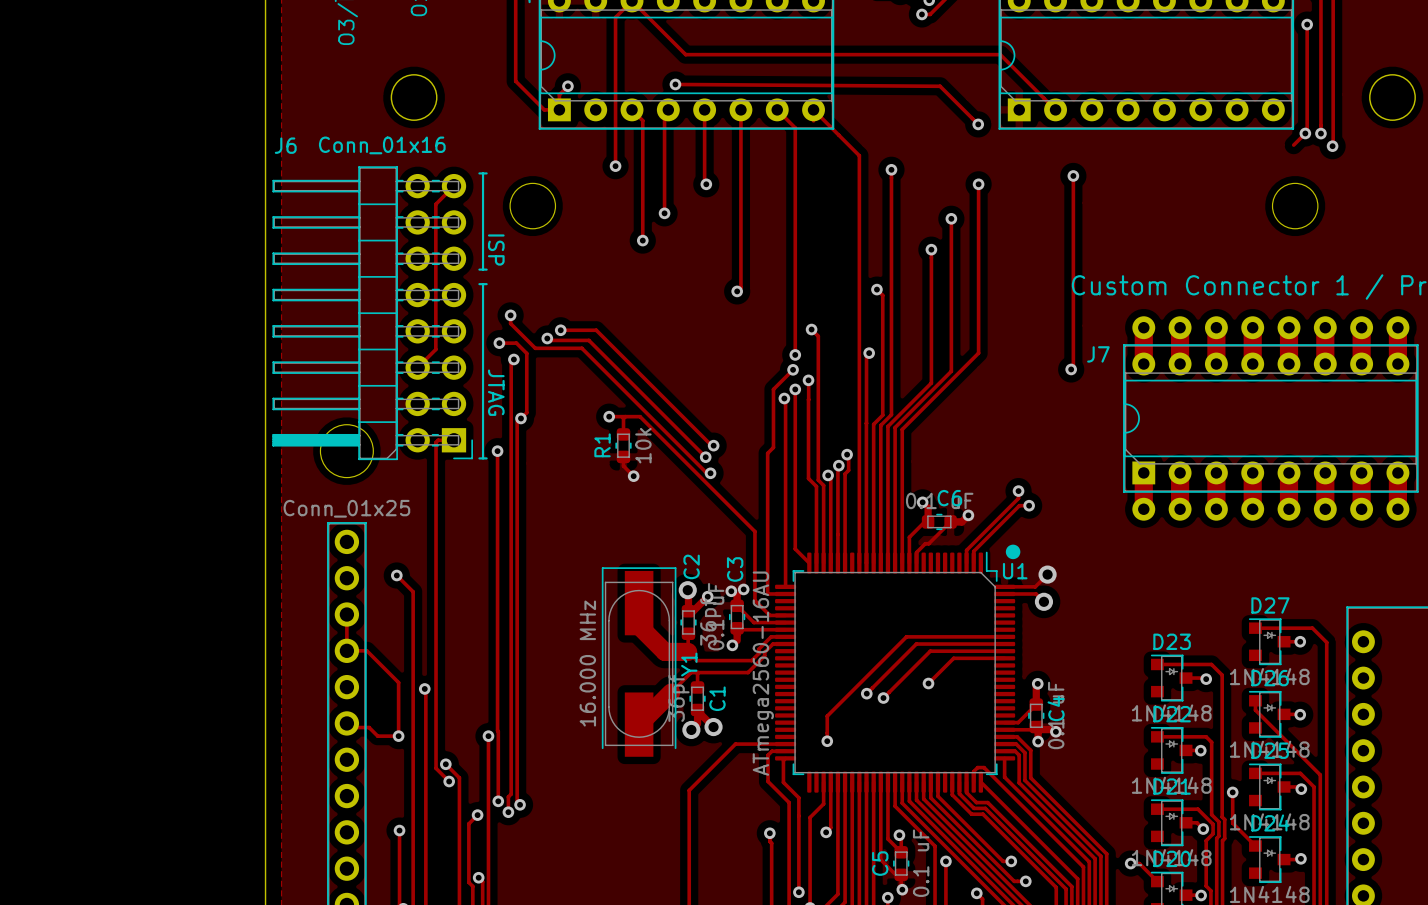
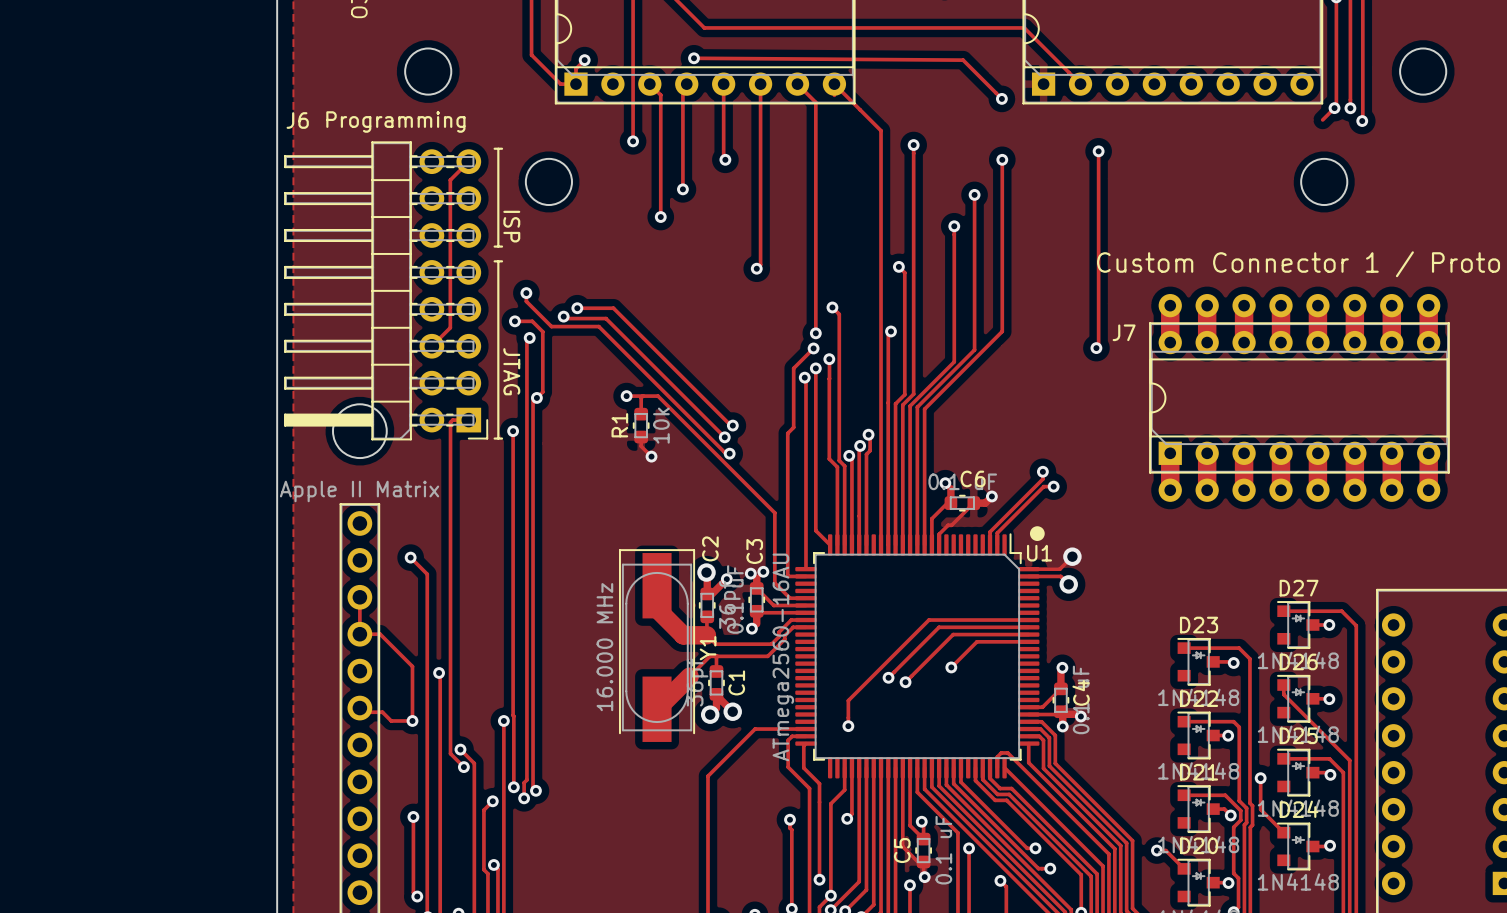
J6 value: Conn_01x16 (382, 145) -> Programming (395, 122)
part value: Conn_01x25 (346, 508) -> Apple II Matrix (359, 491)

